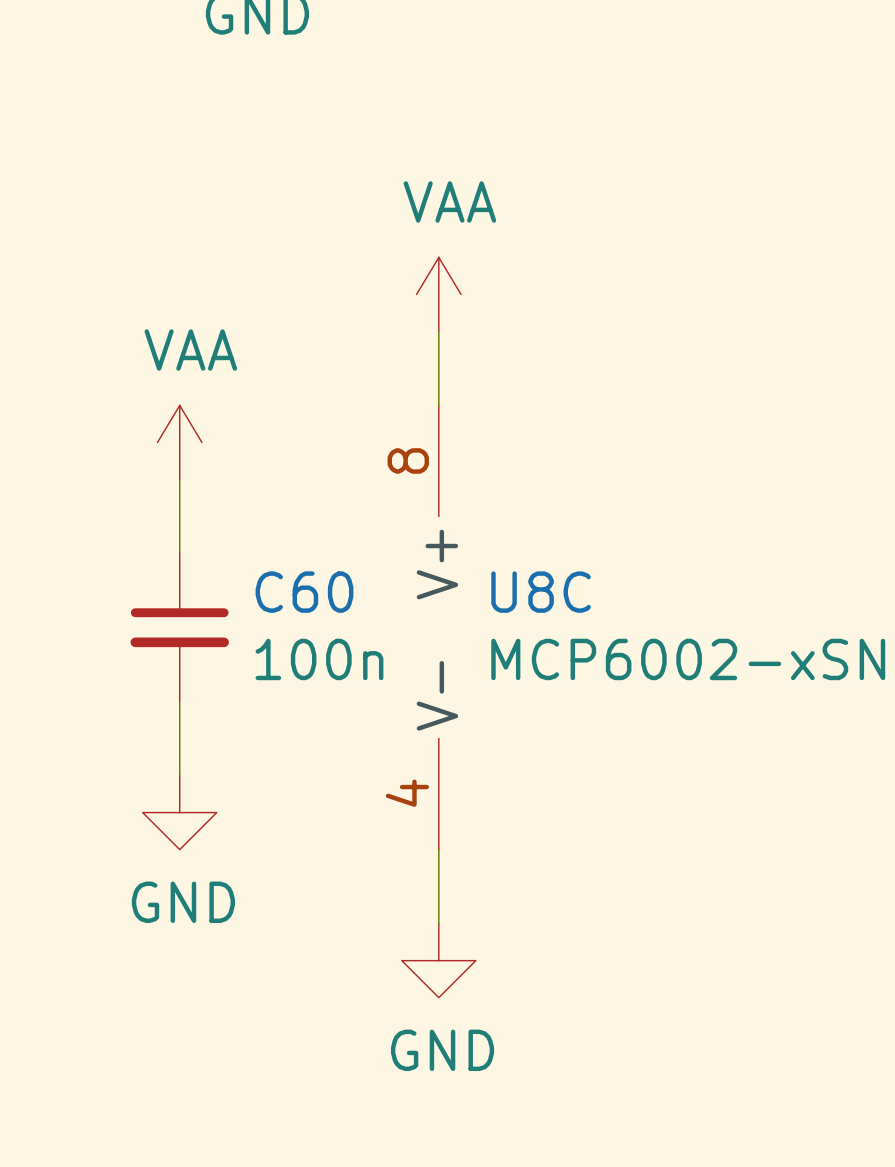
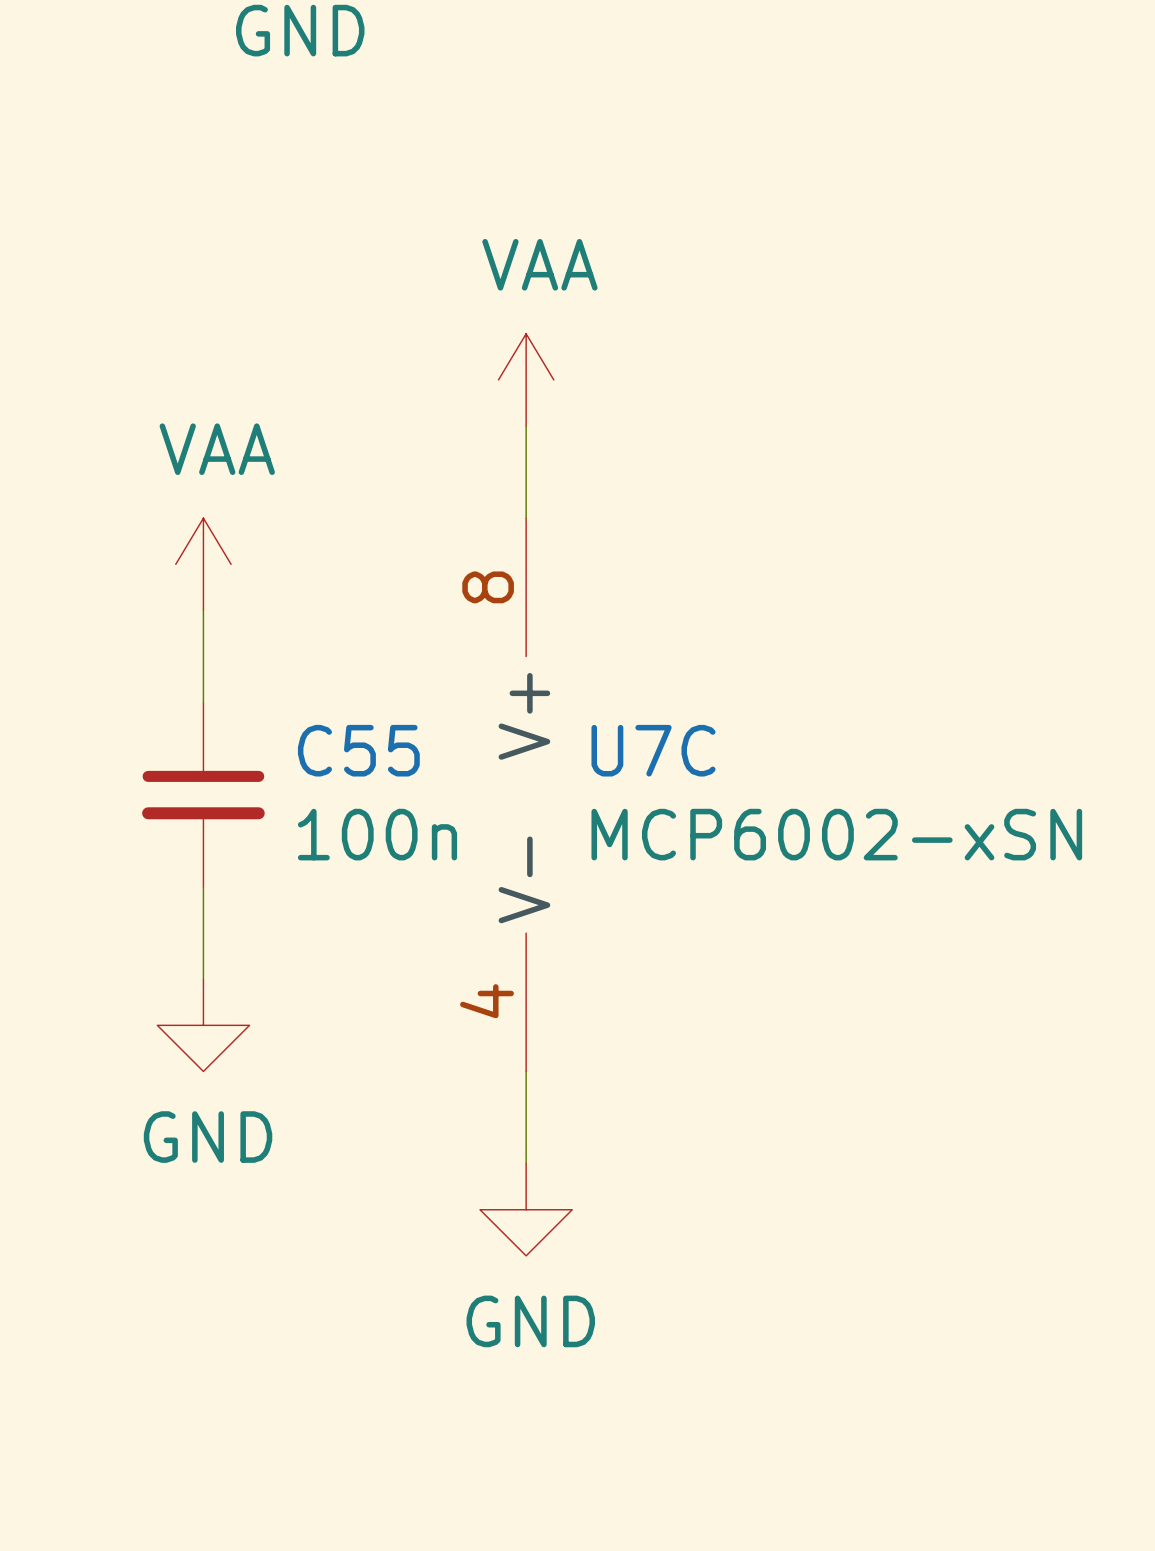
C60 name: C60 (304, 592) -> C55 (358, 750)
U8C name: U8C (541, 592) -> U7C (653, 750)

